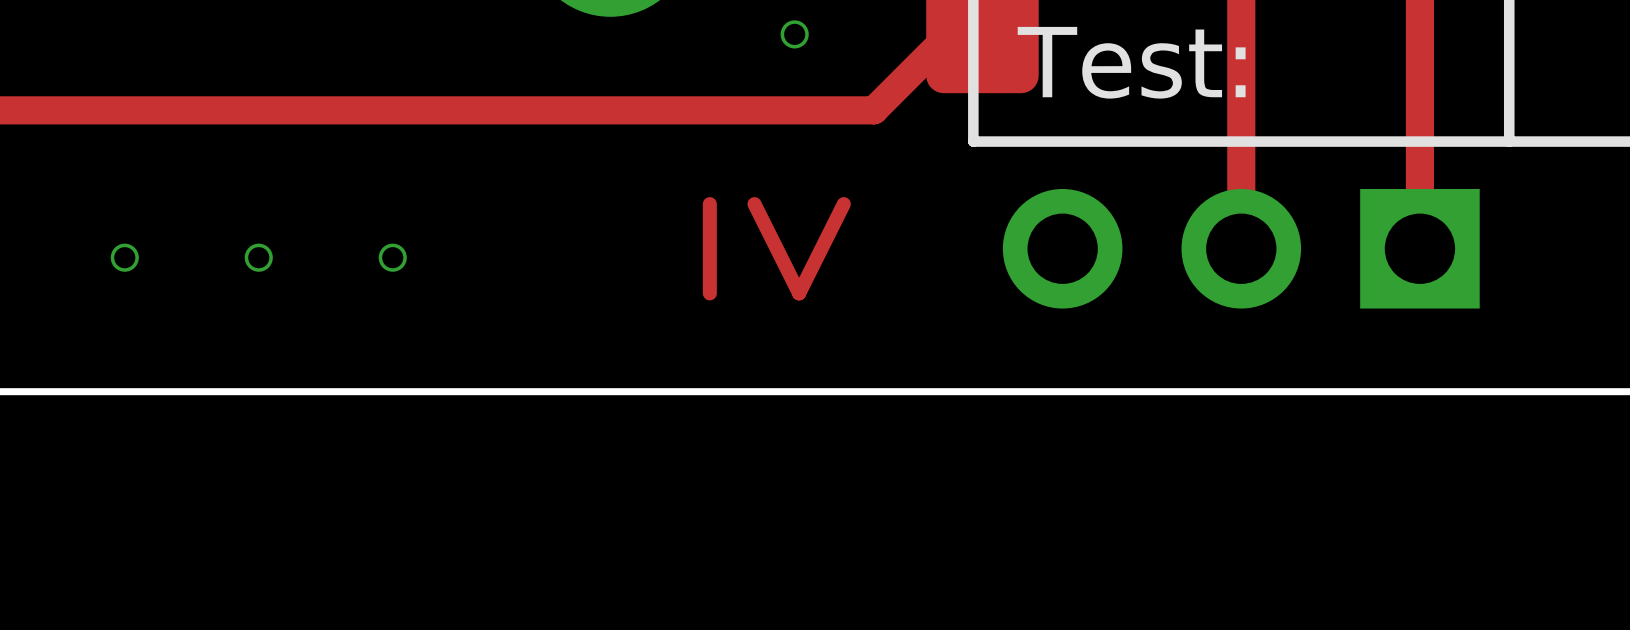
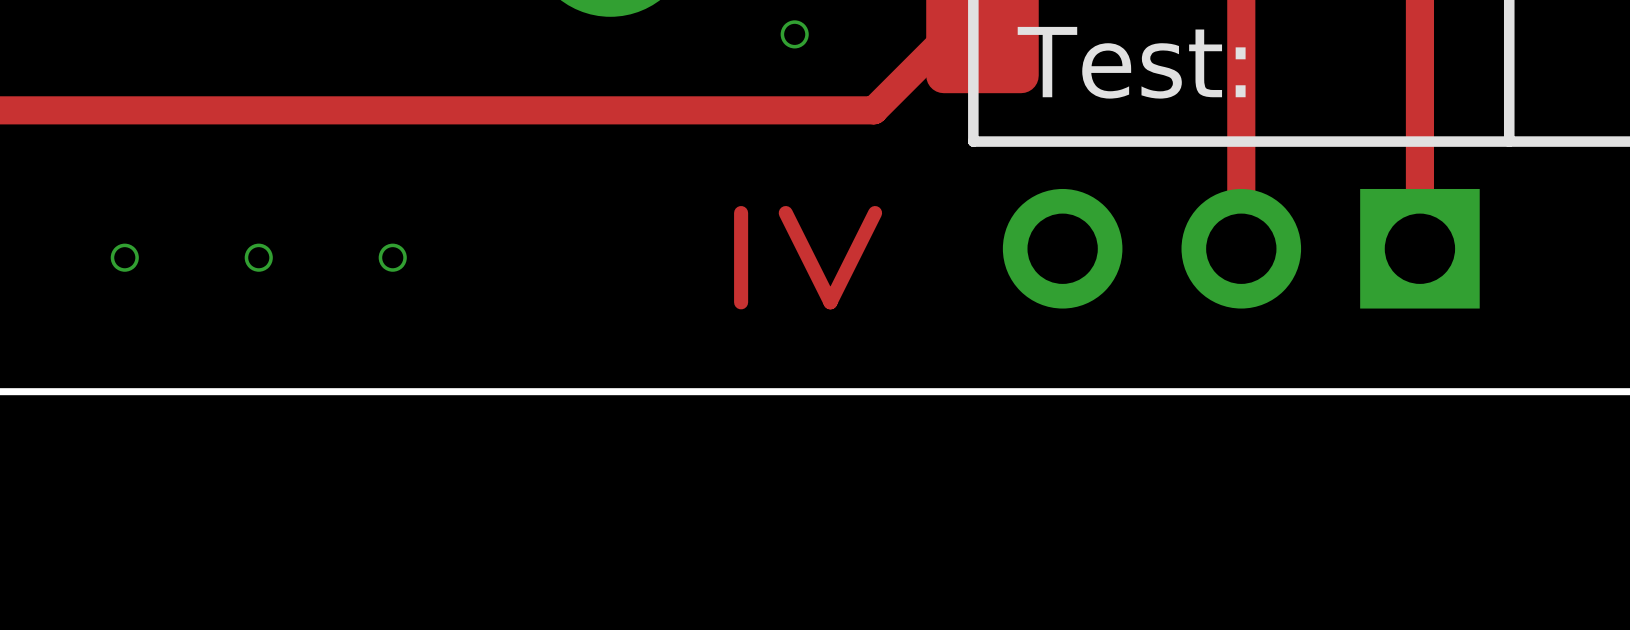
top track: (709, 204) (709, 293) -> (741, 213) (741, 302)
top track: (843, 204) (799, 293) (754, 204) -> (875, 213) (830, 302) (785, 213)

